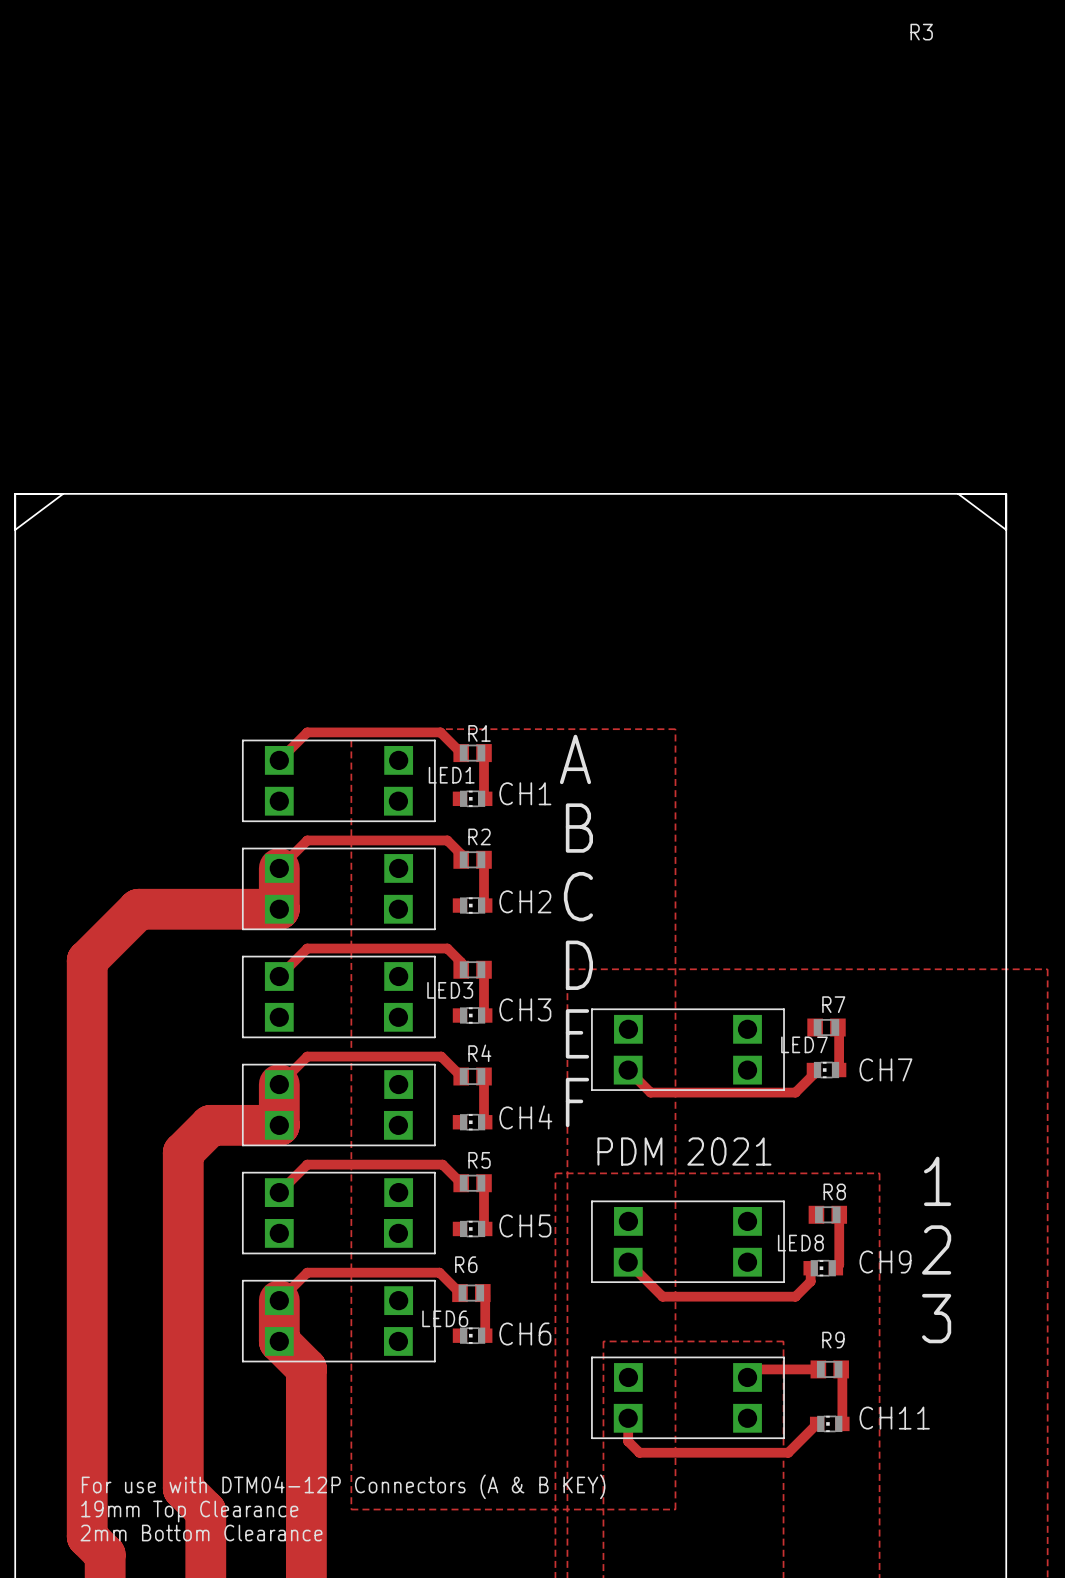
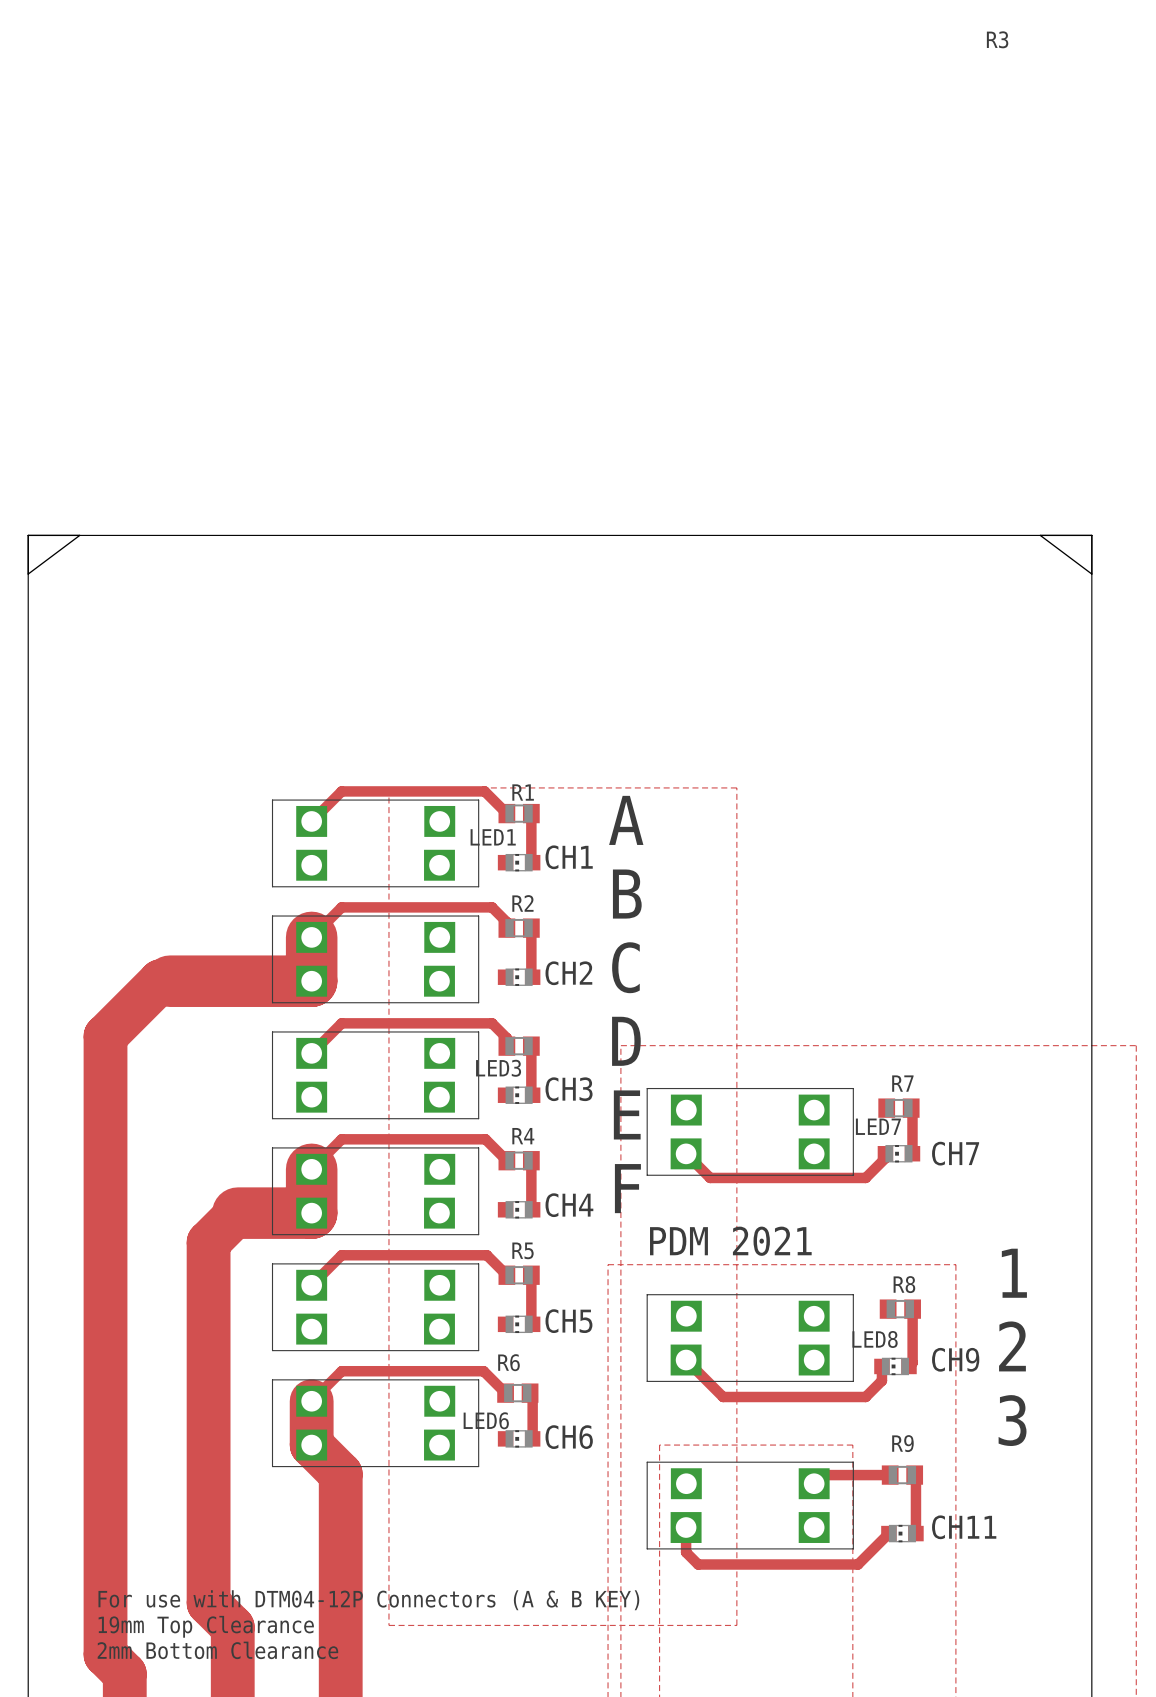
track width: thin (279, 868) (279, 909) (147, 909) -> thick (311, 937) (311, 981) (169, 981)
track width: thin (279, 1084) (279, 1125) (210, 1125) -> thick (311, 1169) (311, 1213) (237, 1213)

